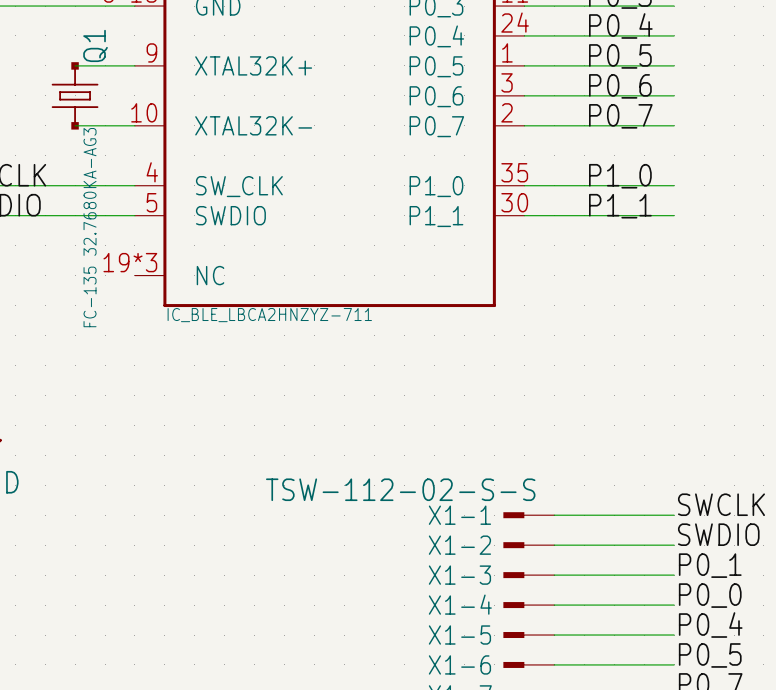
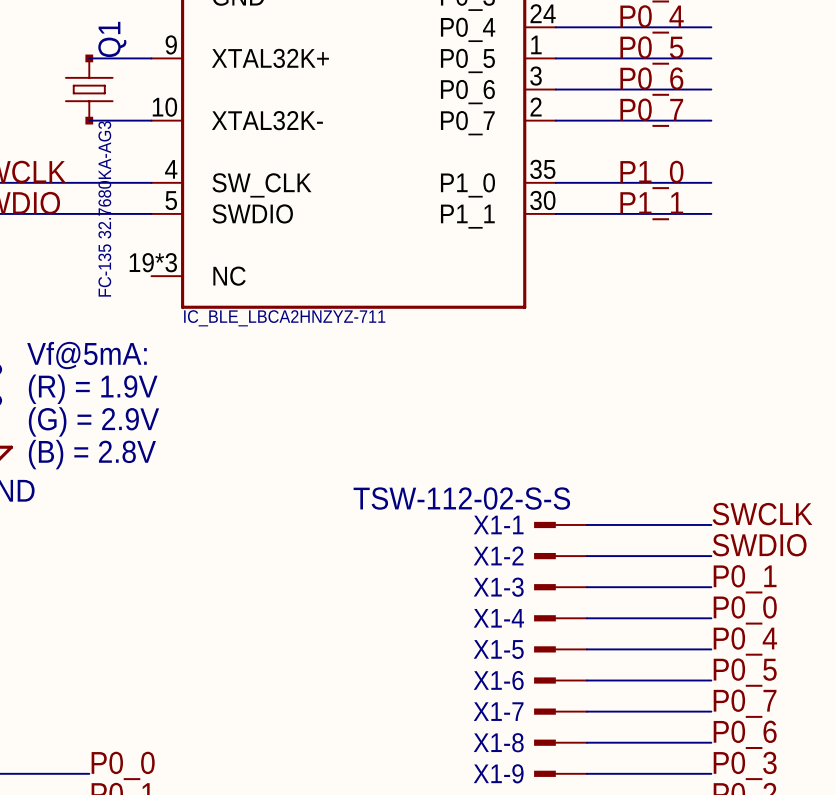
text: none -> Vf@5mA: (86, 355)
text: none -> (R) = 1.9V (93, 389)
text: none -> (G) = 2.9V (93, 421)
text: none -> (B) = 2.8V (92, 454)

